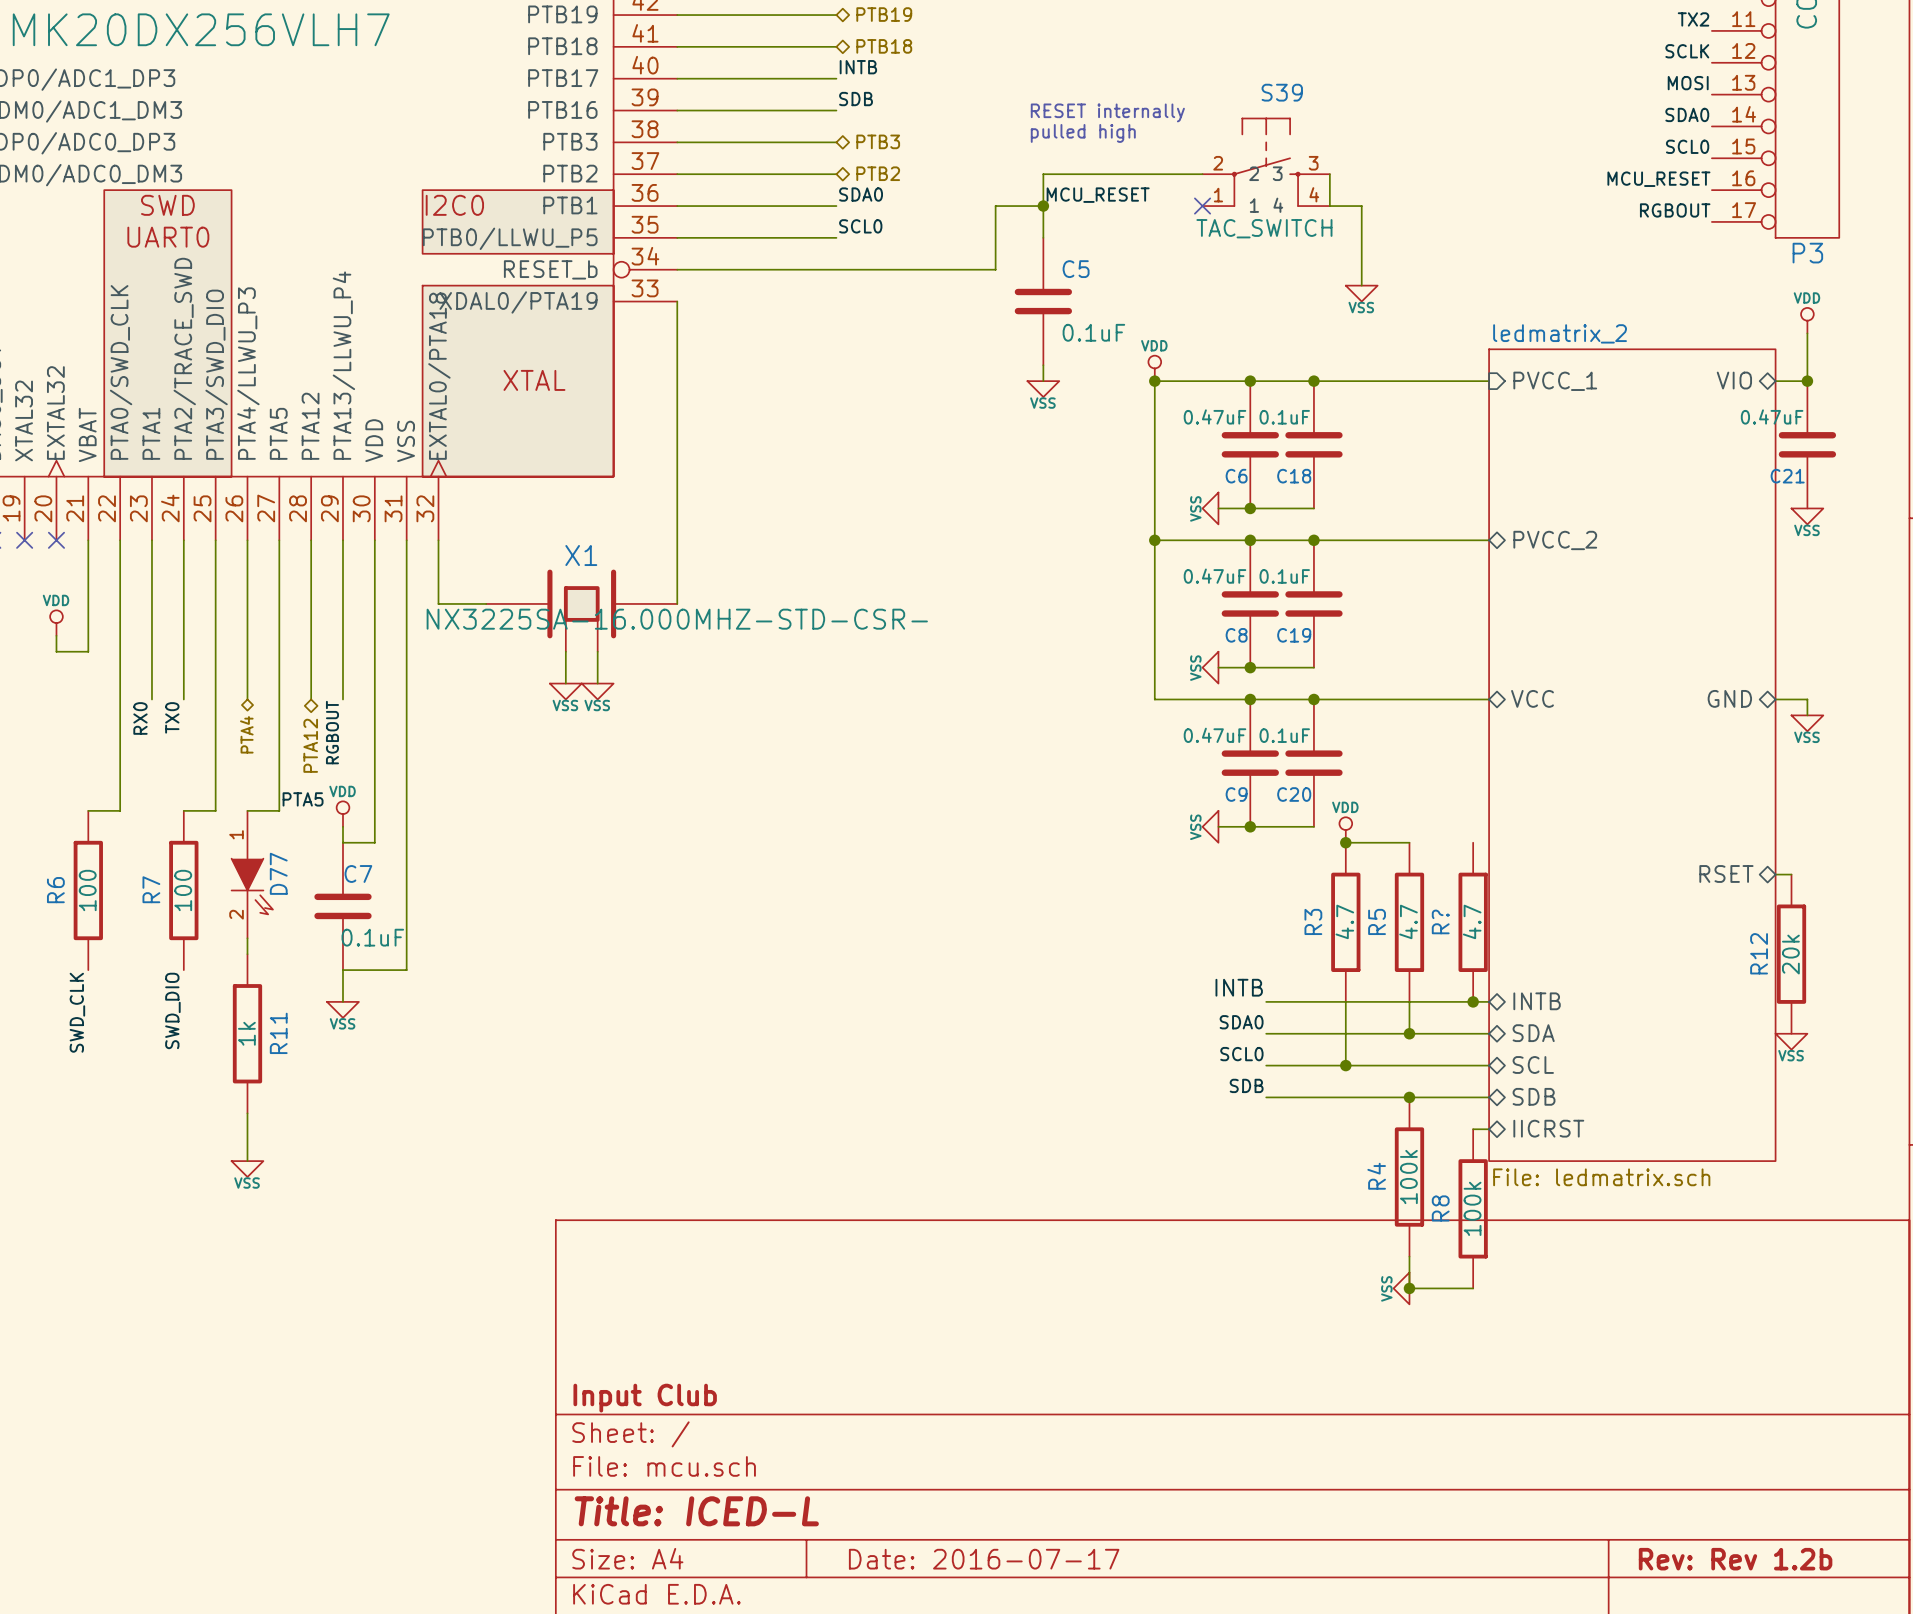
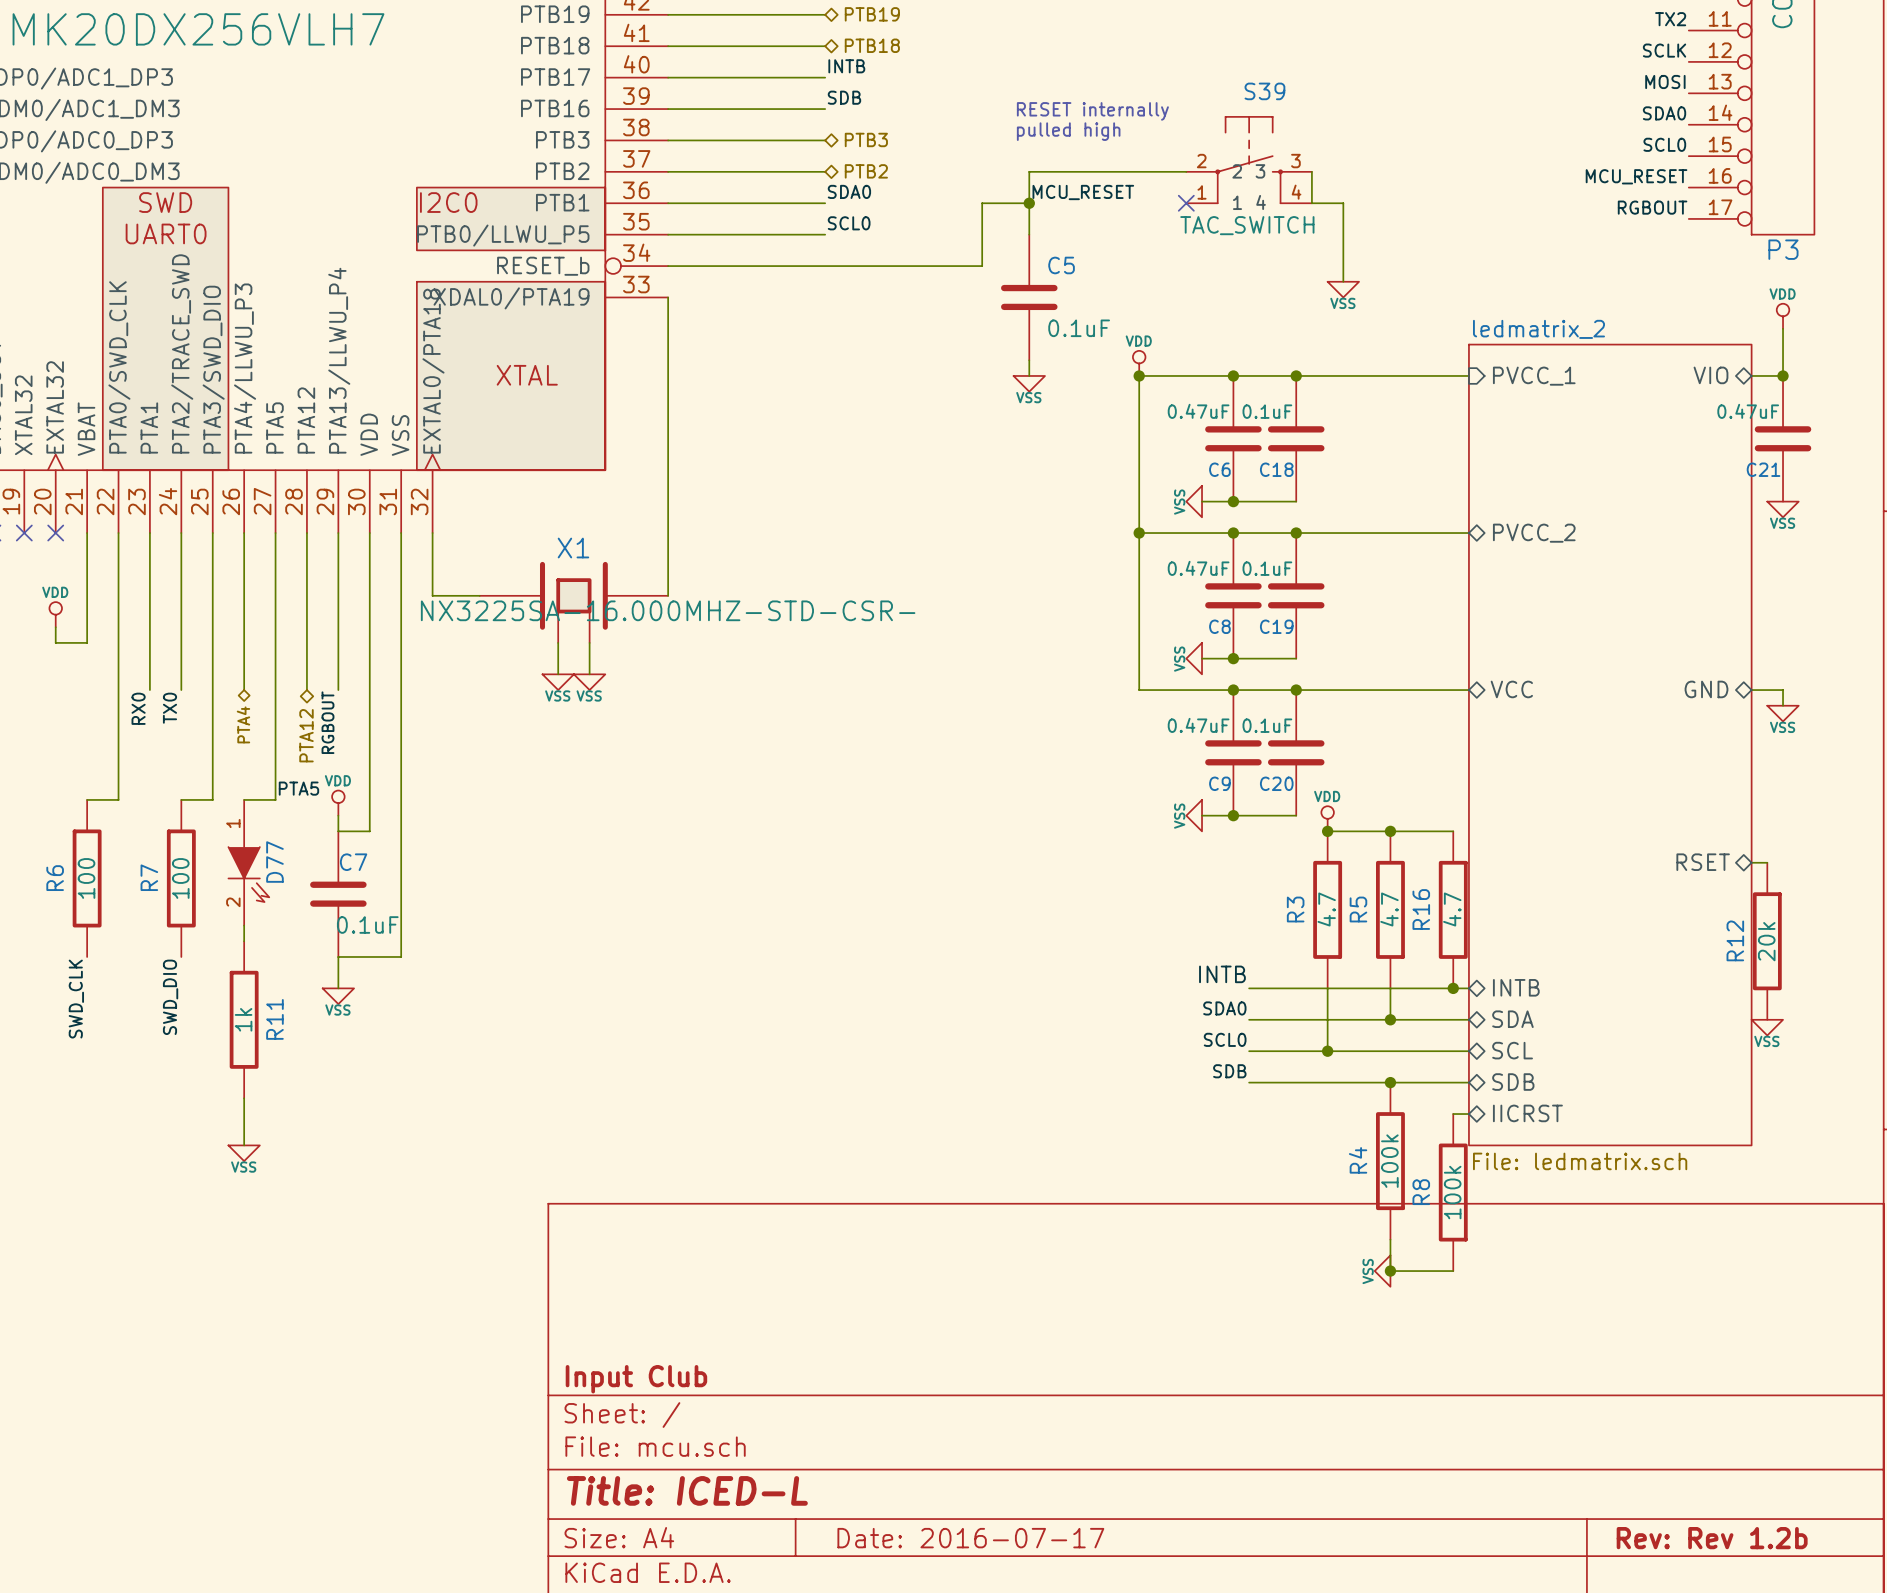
wire: none -> (1390, 831) (1453, 831)
junction: none -> (1390, 831)
R? name: R? (1440, 921) -> R16 (1421, 909)

